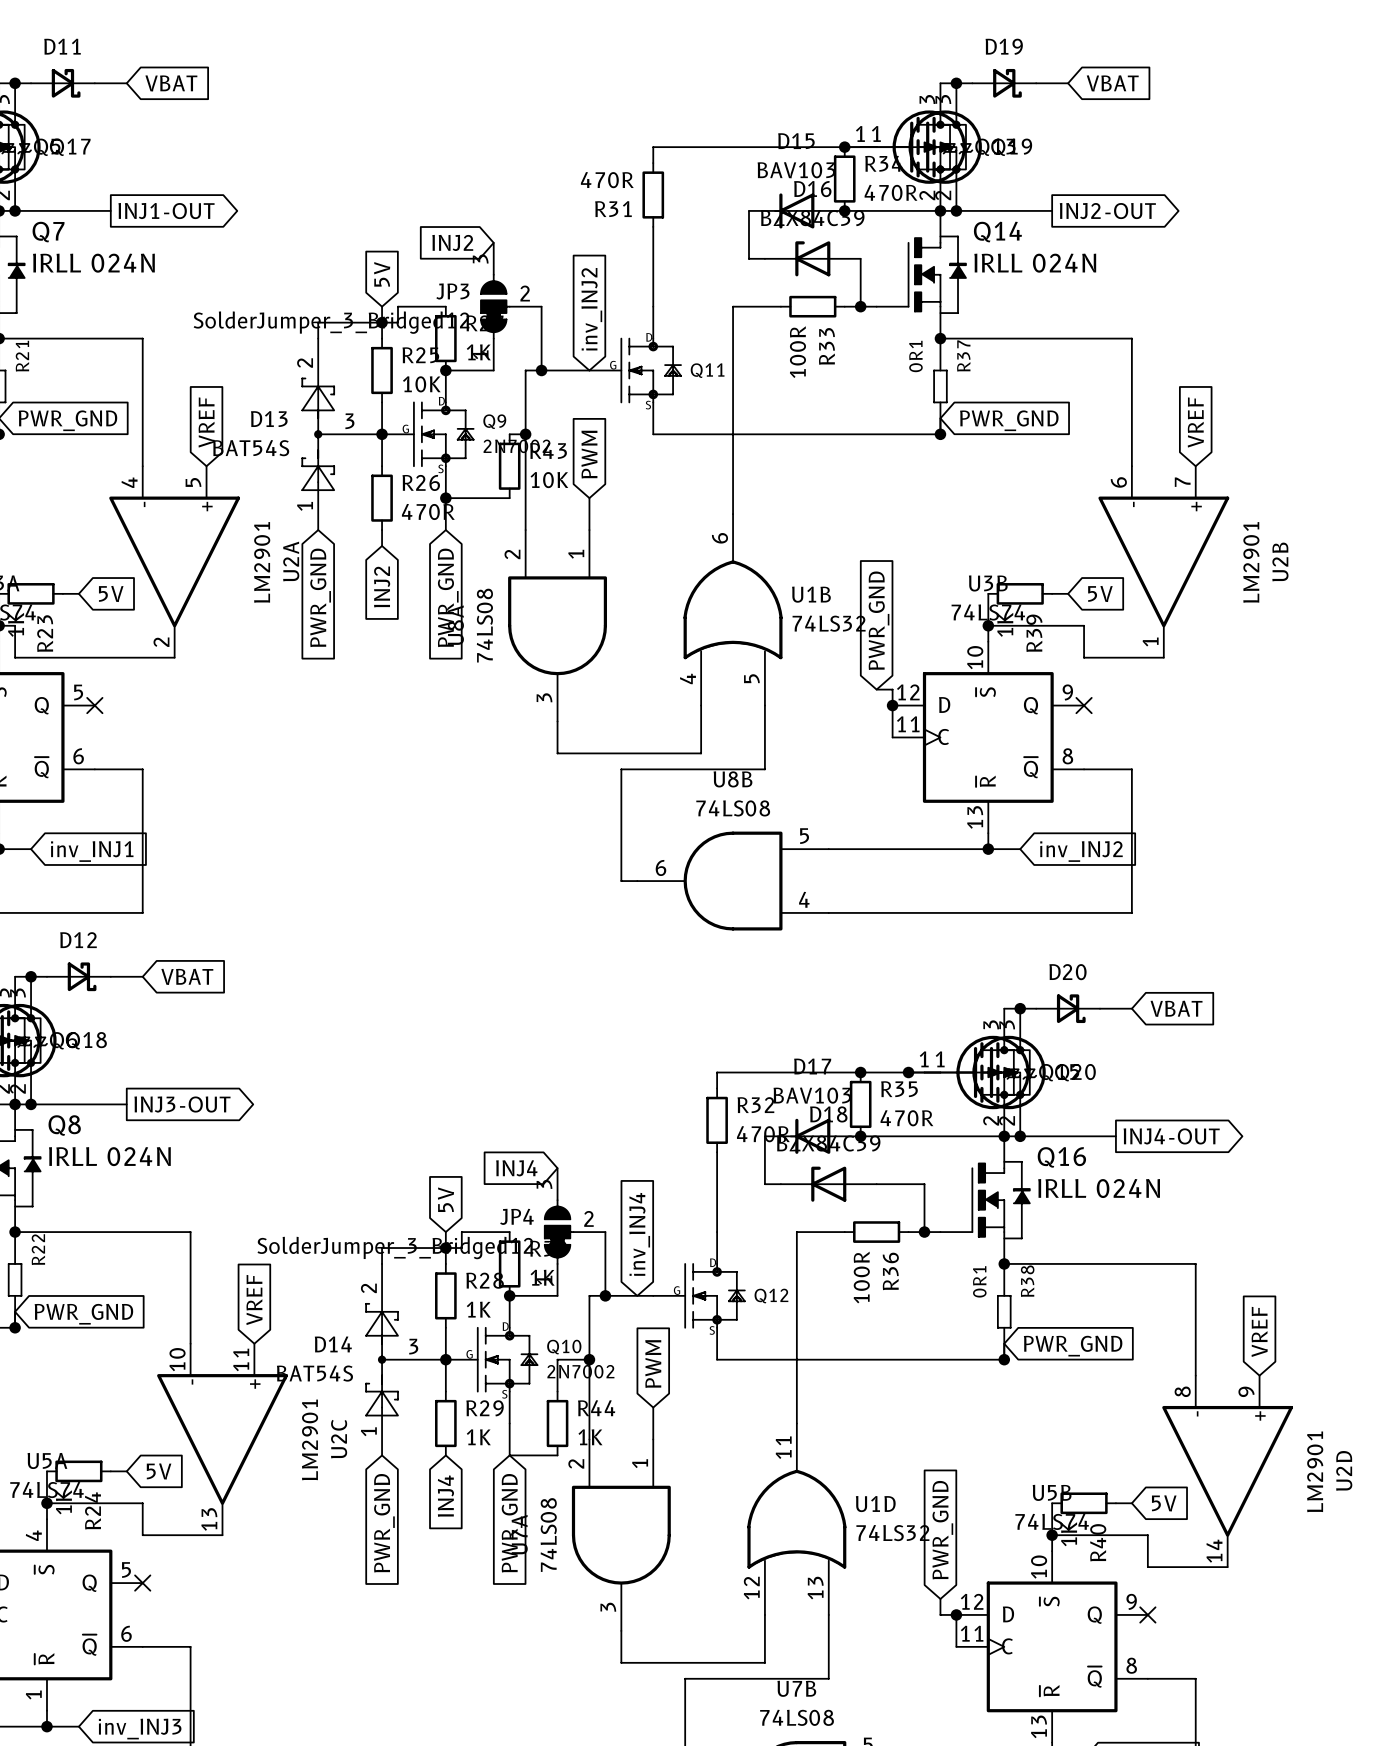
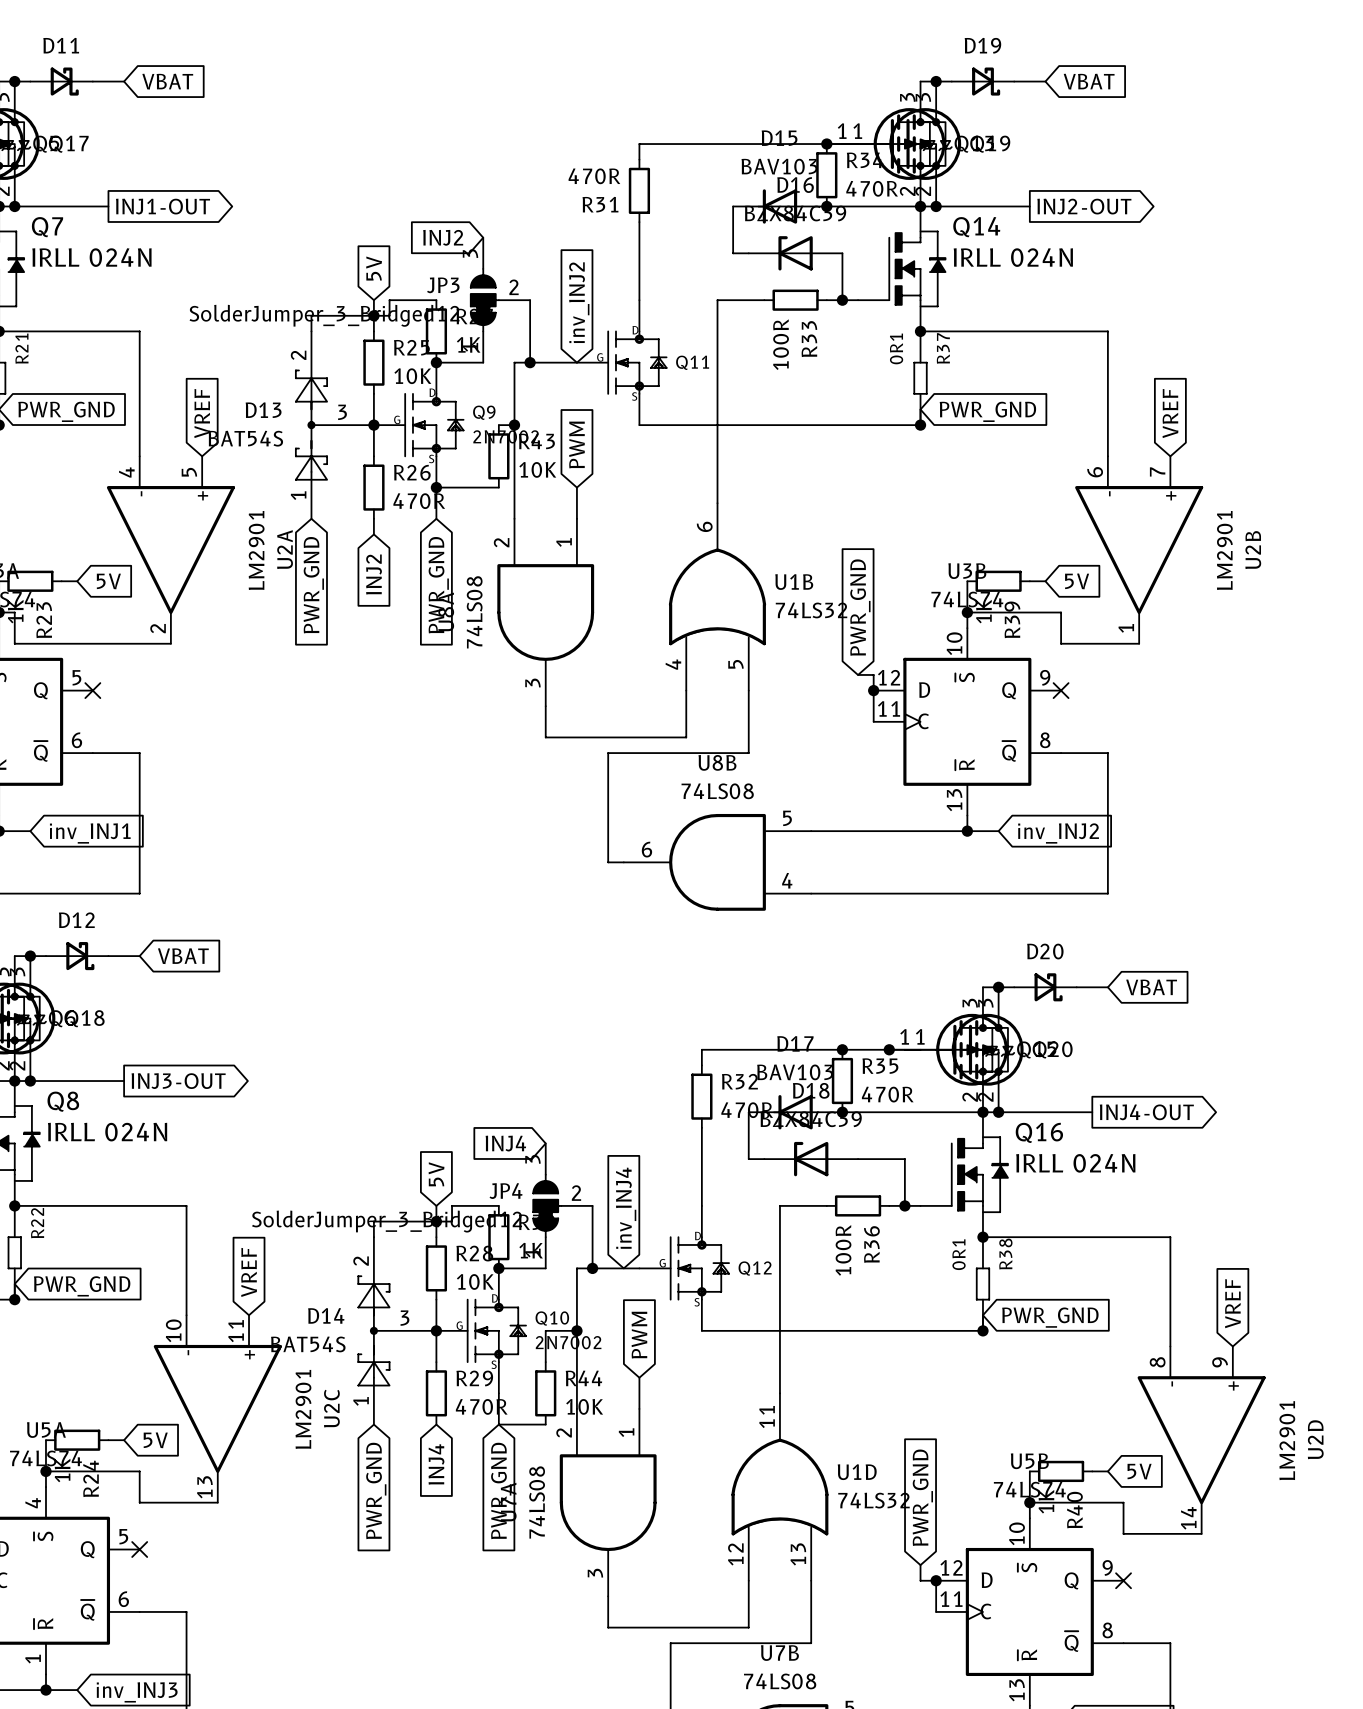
R28 value: 1K (478, 1309) -> 10K (475, 1281)
R29 value: 1K (478, 1437) -> 470R (481, 1406)
R44 value: 1K (590, 1437) -> 10K (584, 1406)

